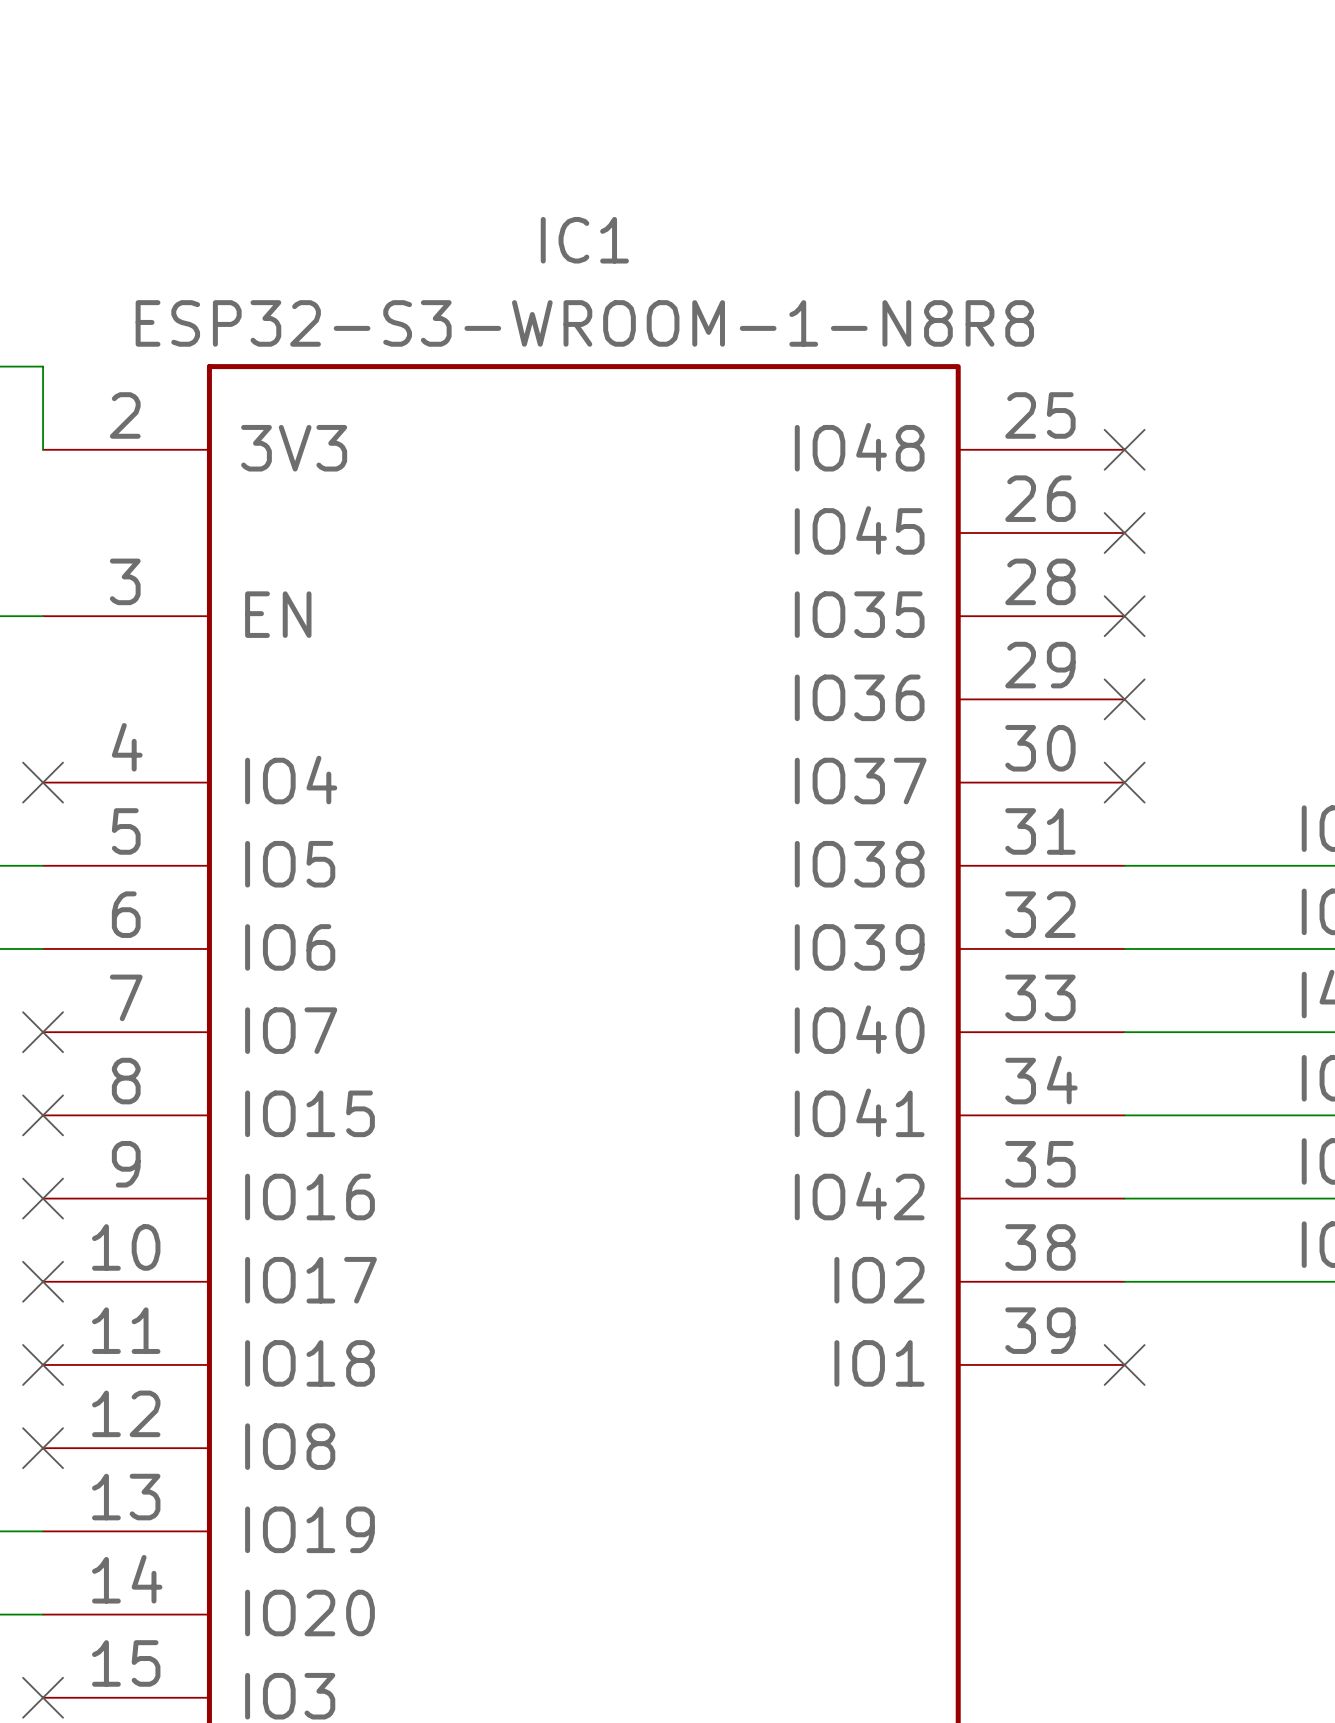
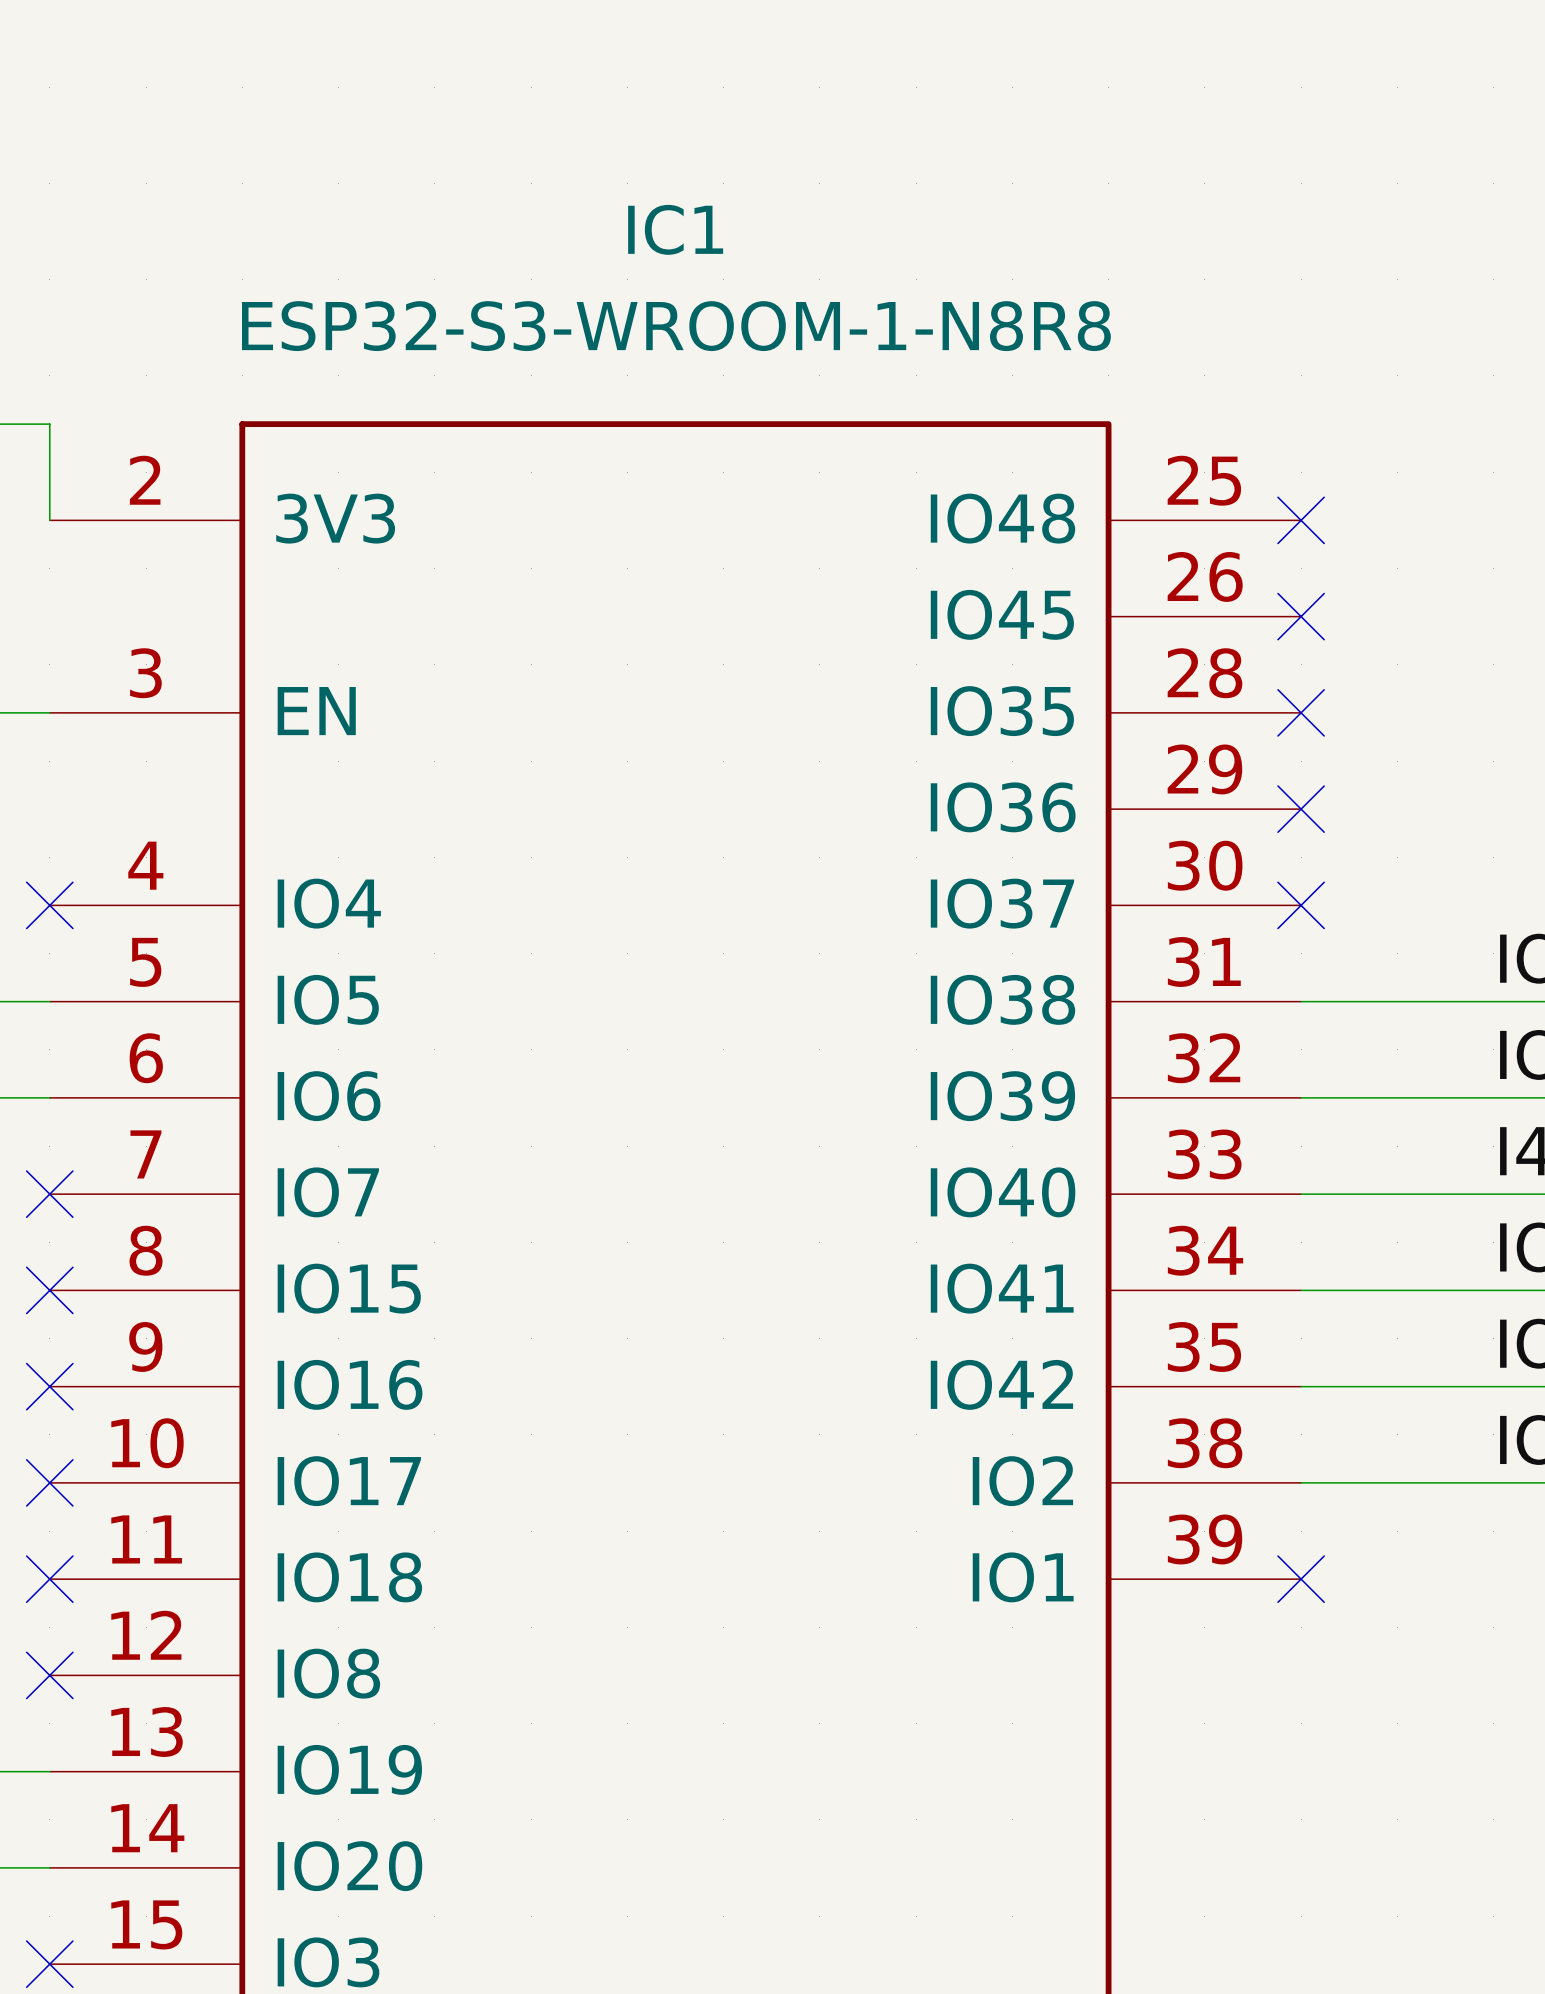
IC1 name position: IC1 (584, 240) -> IC1 (675, 229)
IC1 value position: ESP32-S3-WROOM-1-N8R8 (584, 323) -> ESP32-S3-WROOM-1-N8R8 (676, 326)

